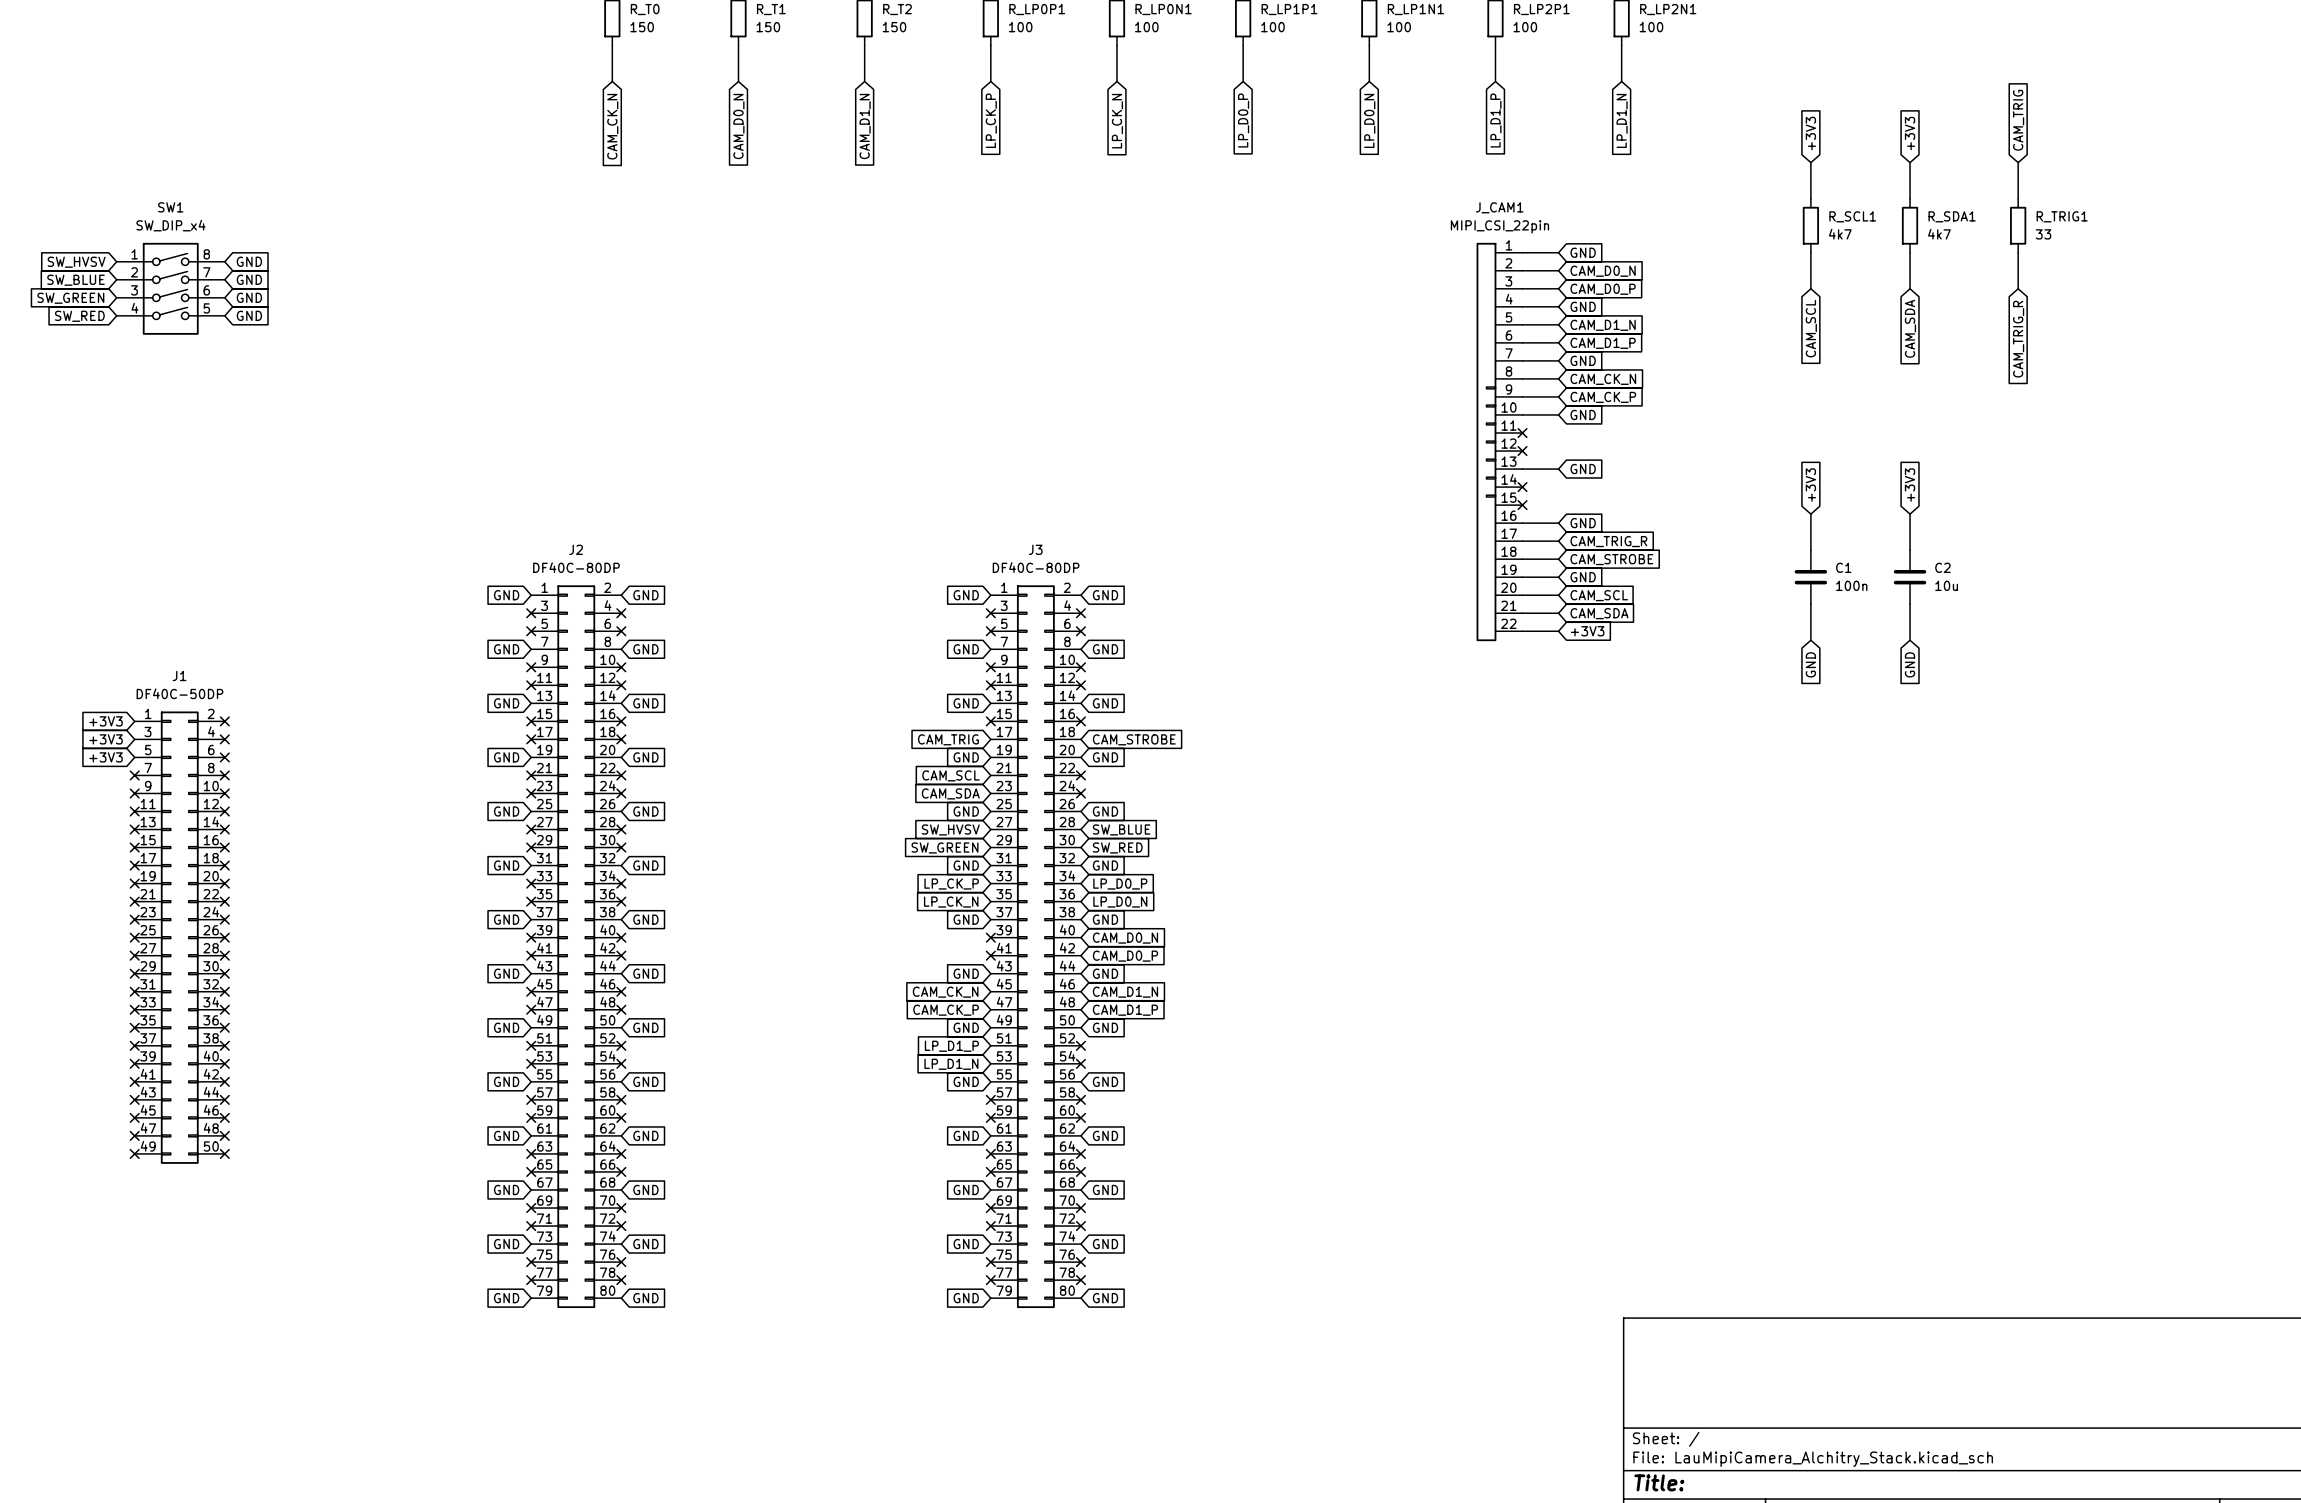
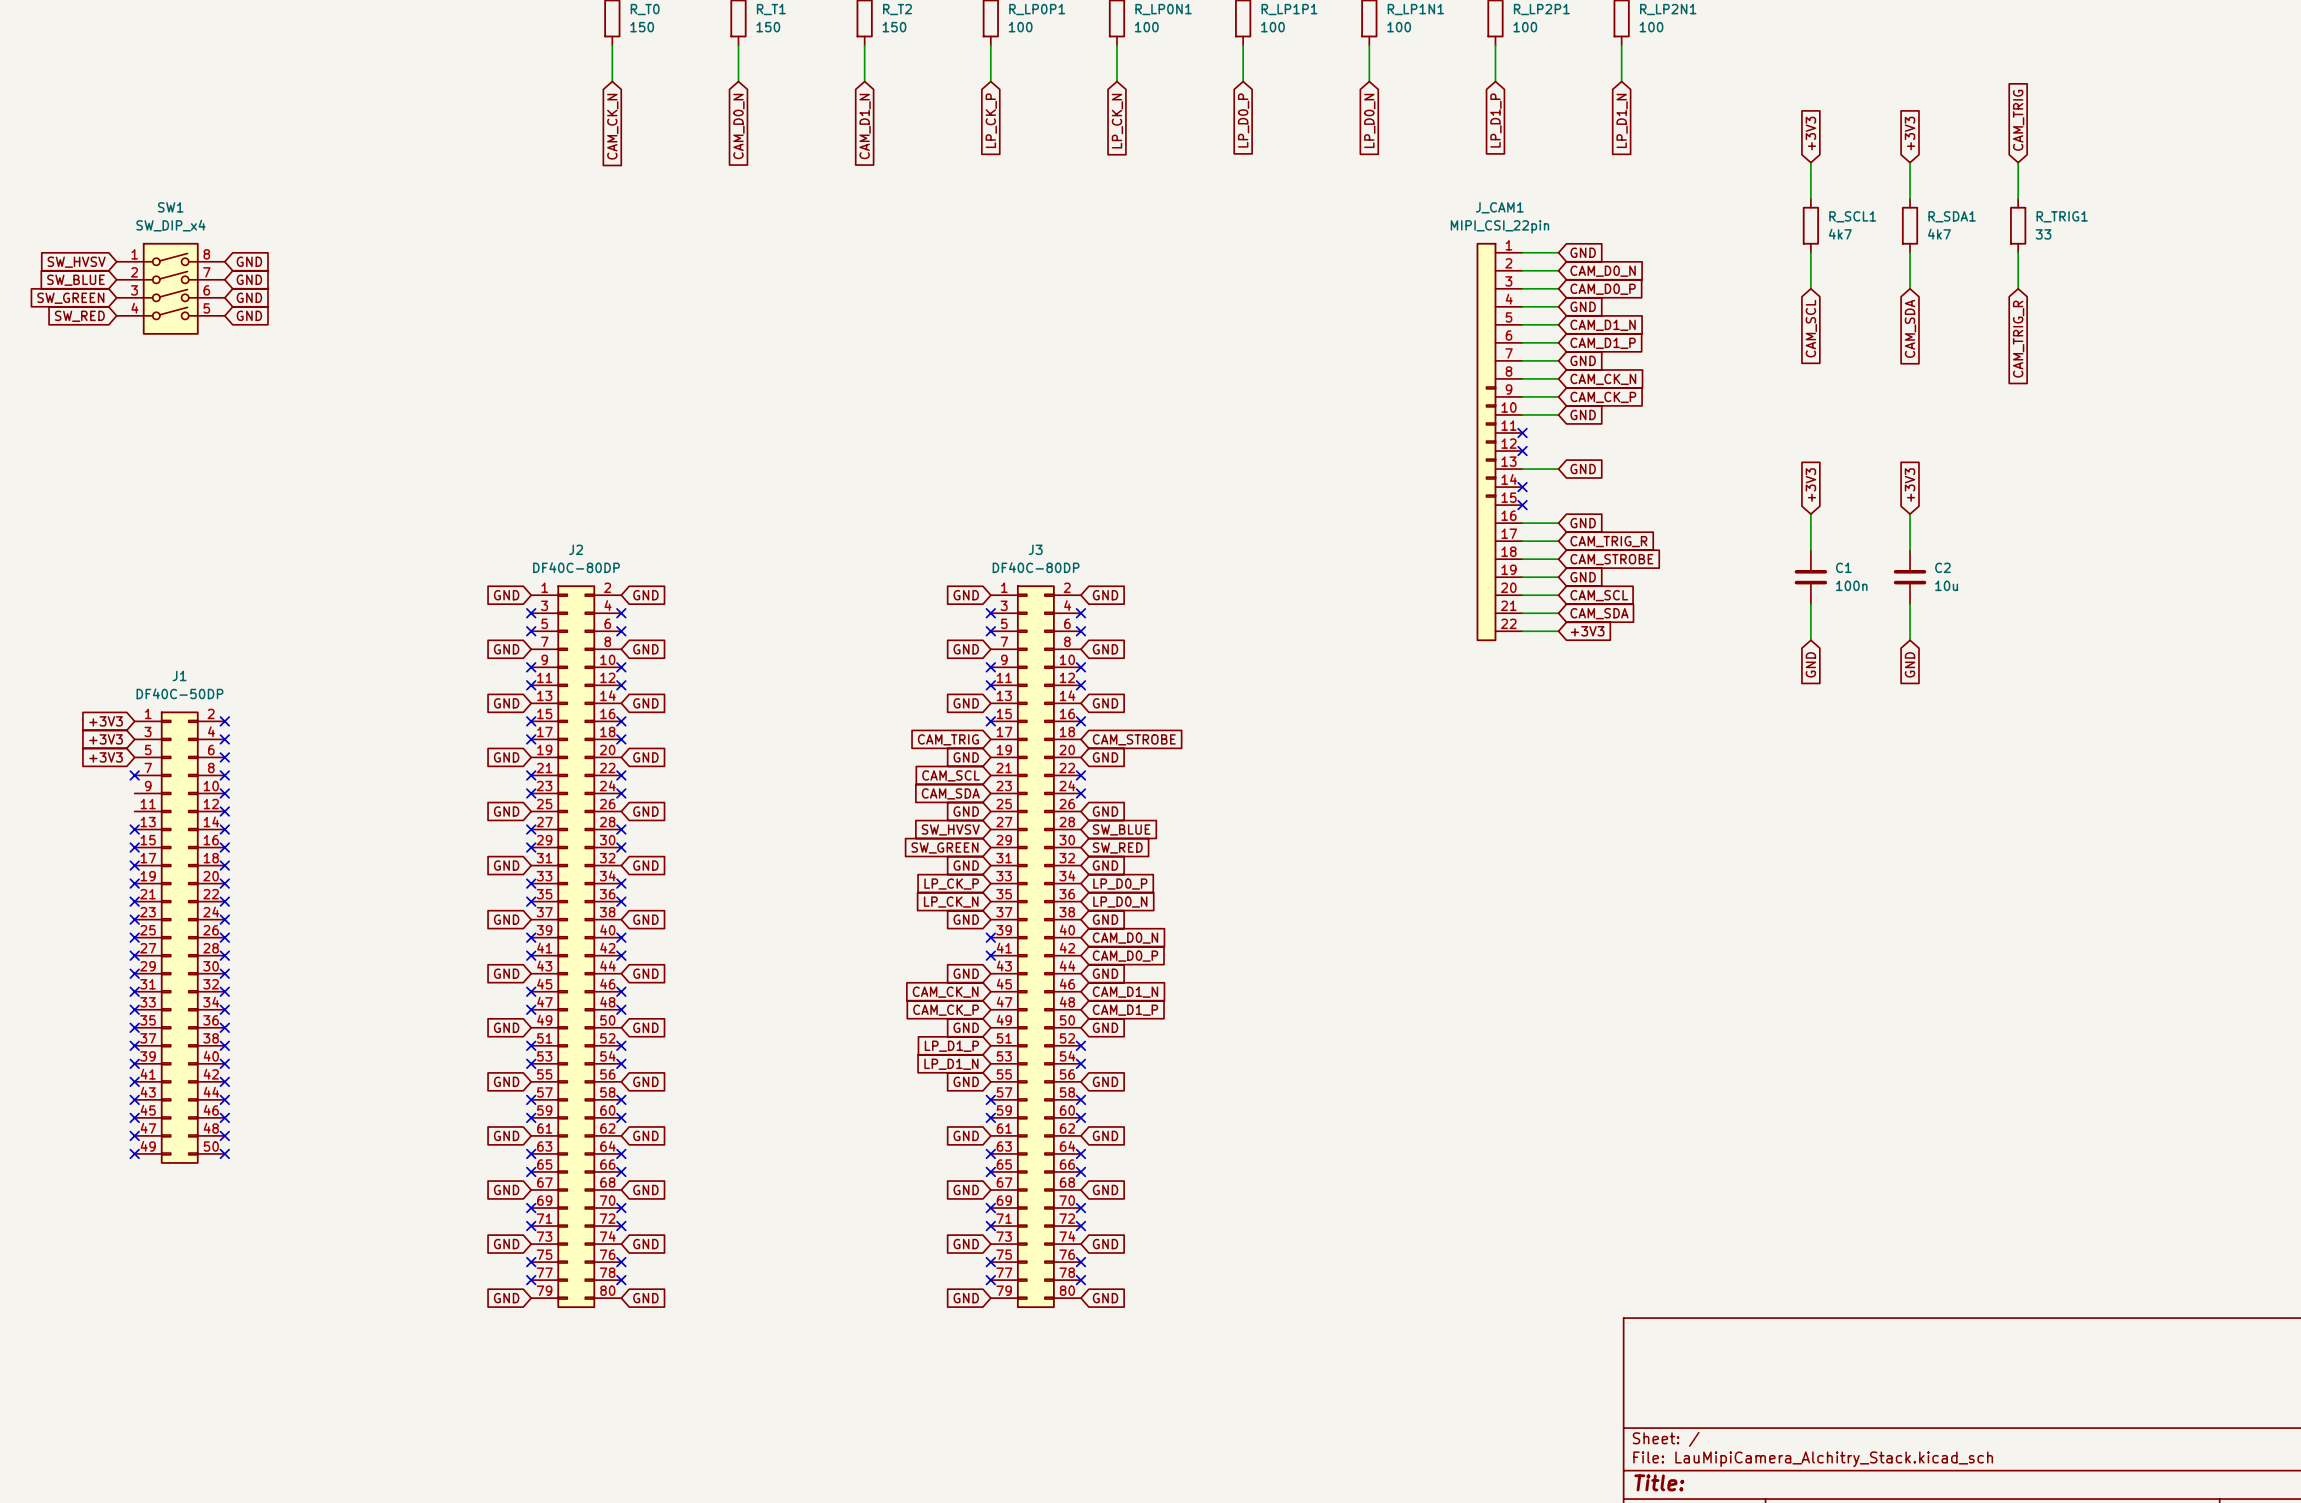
no-connect mark: (134, 793) -> none
no-connect mark: (134, 811) -> none

